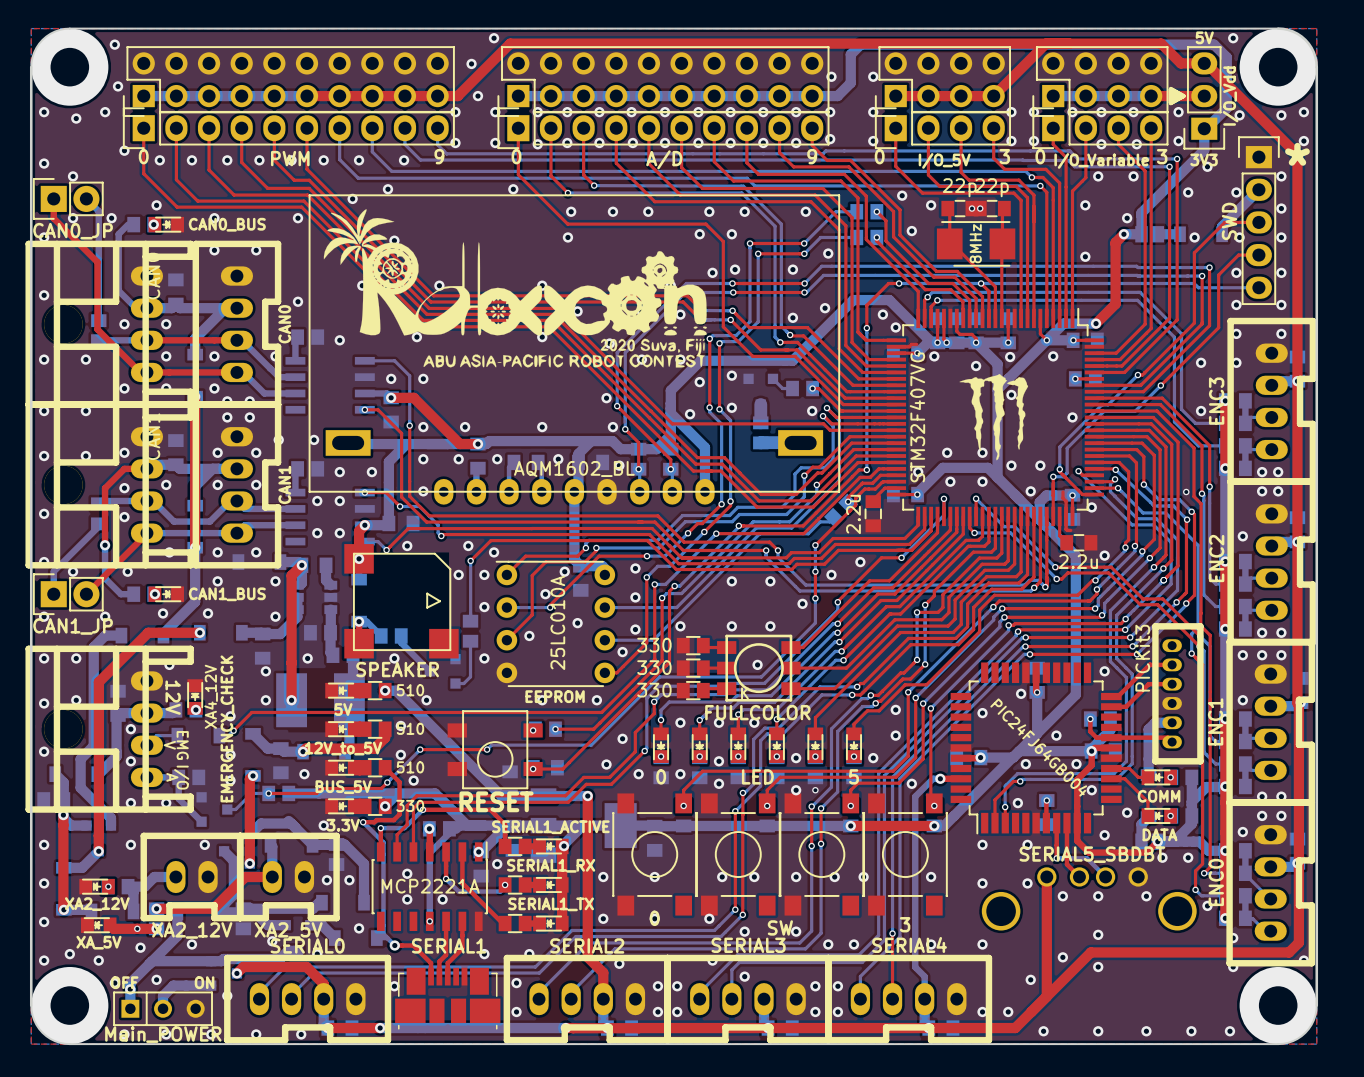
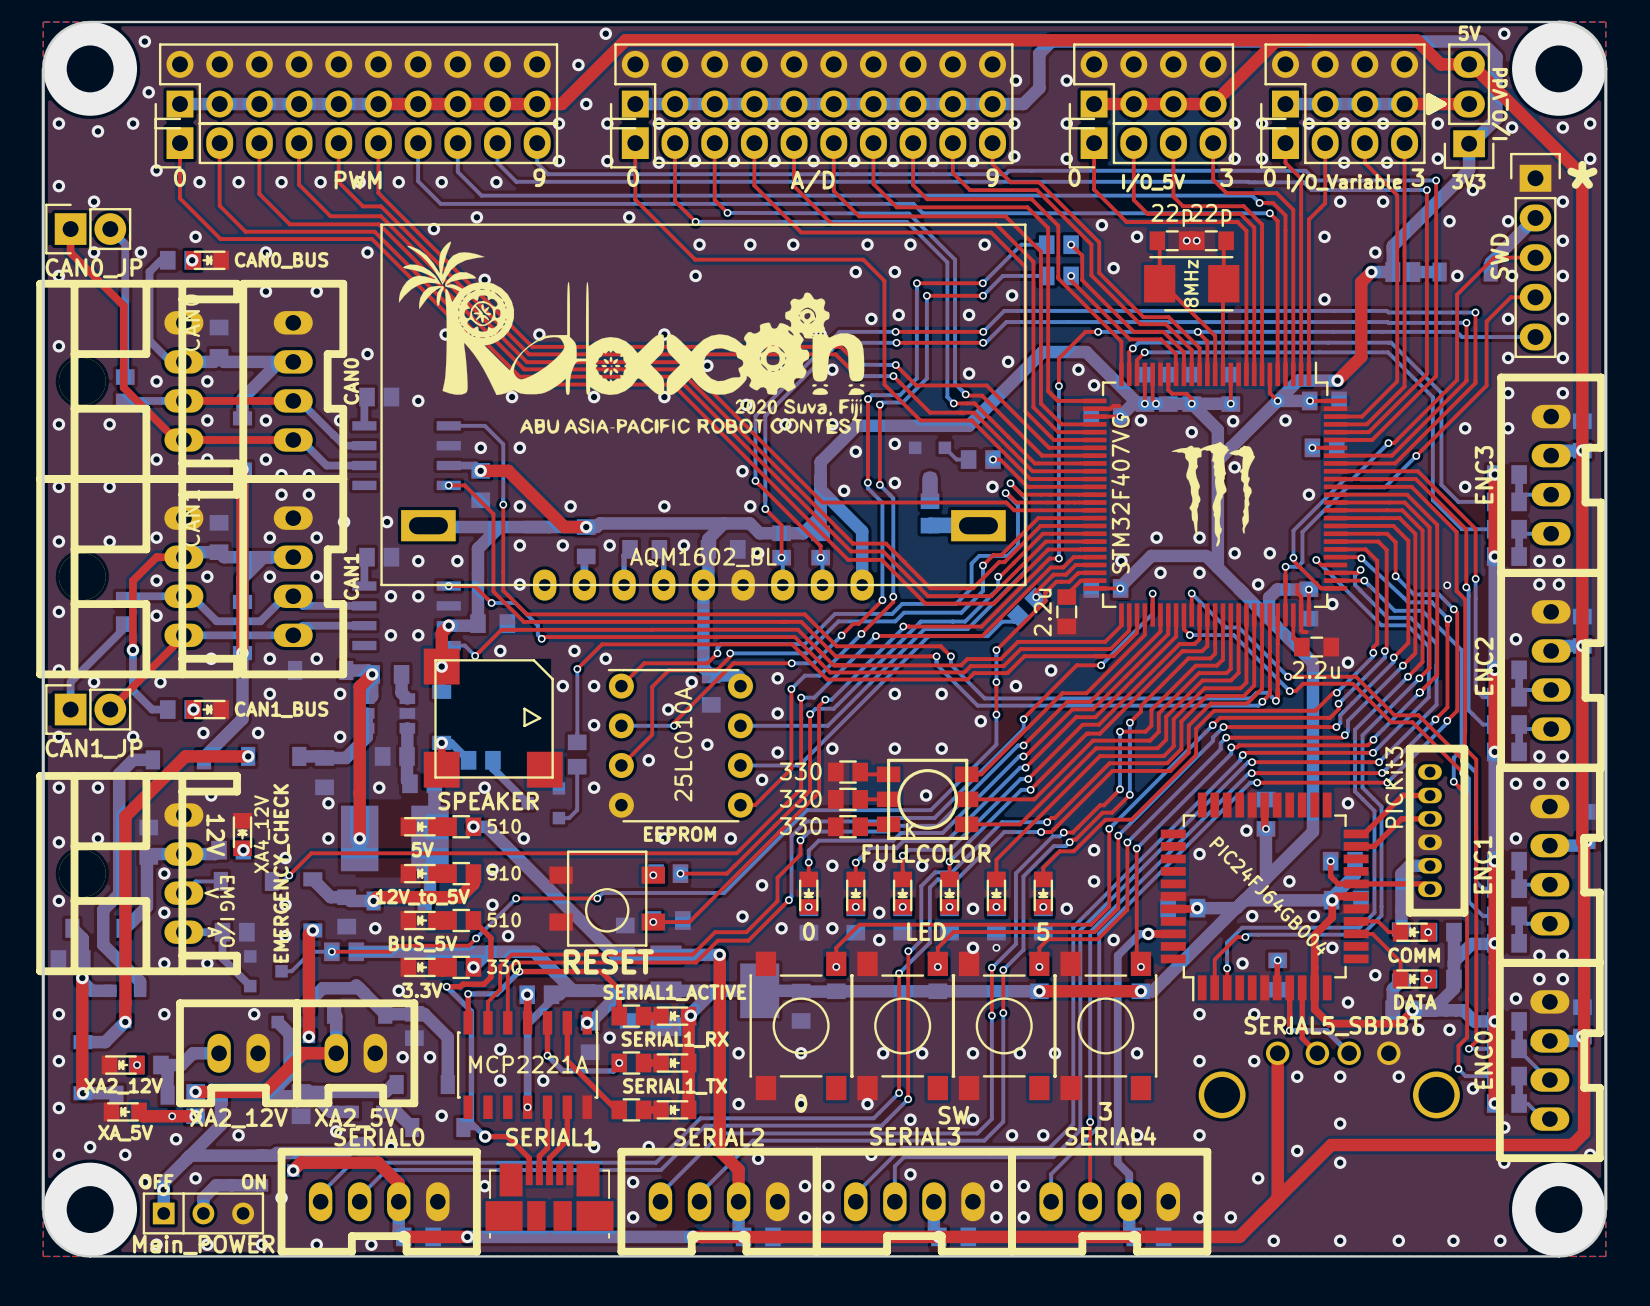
via: none -> (594, 397)

